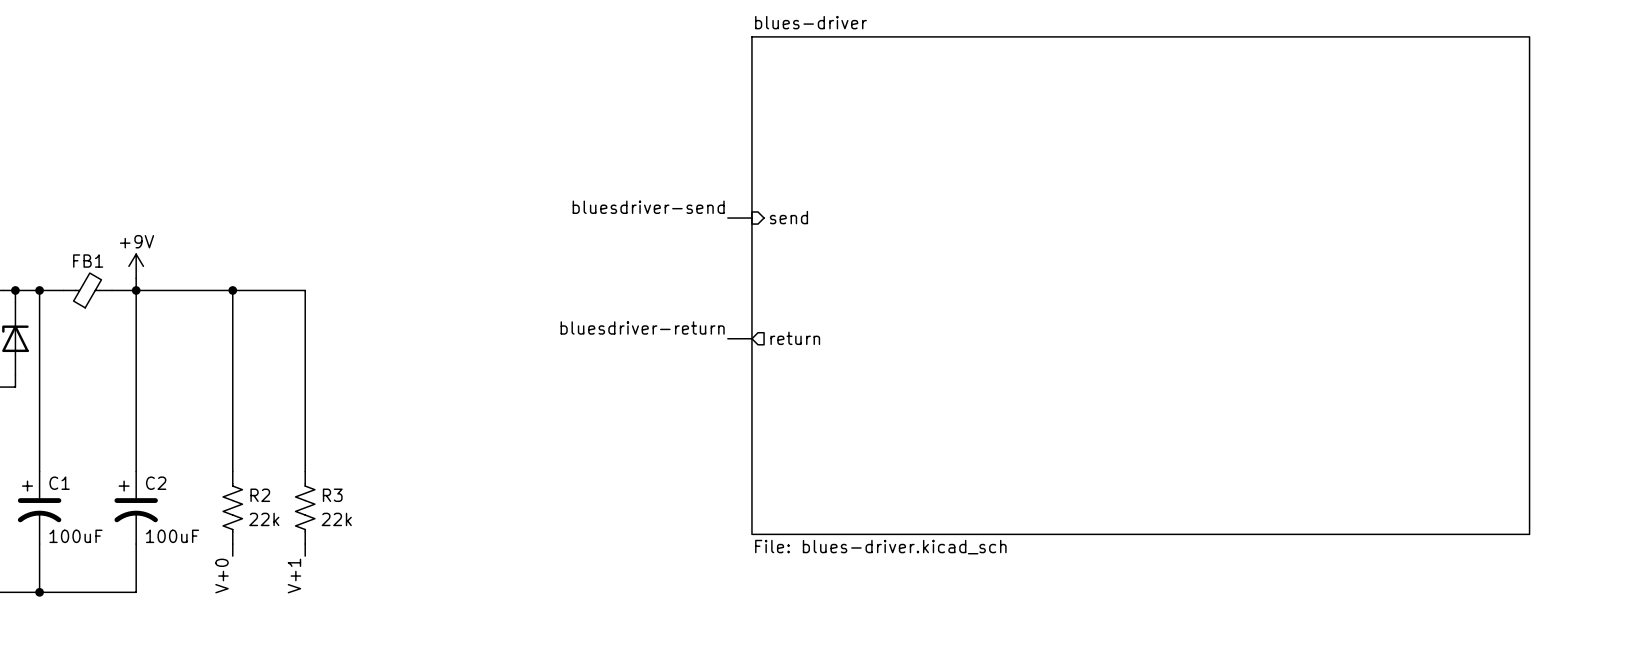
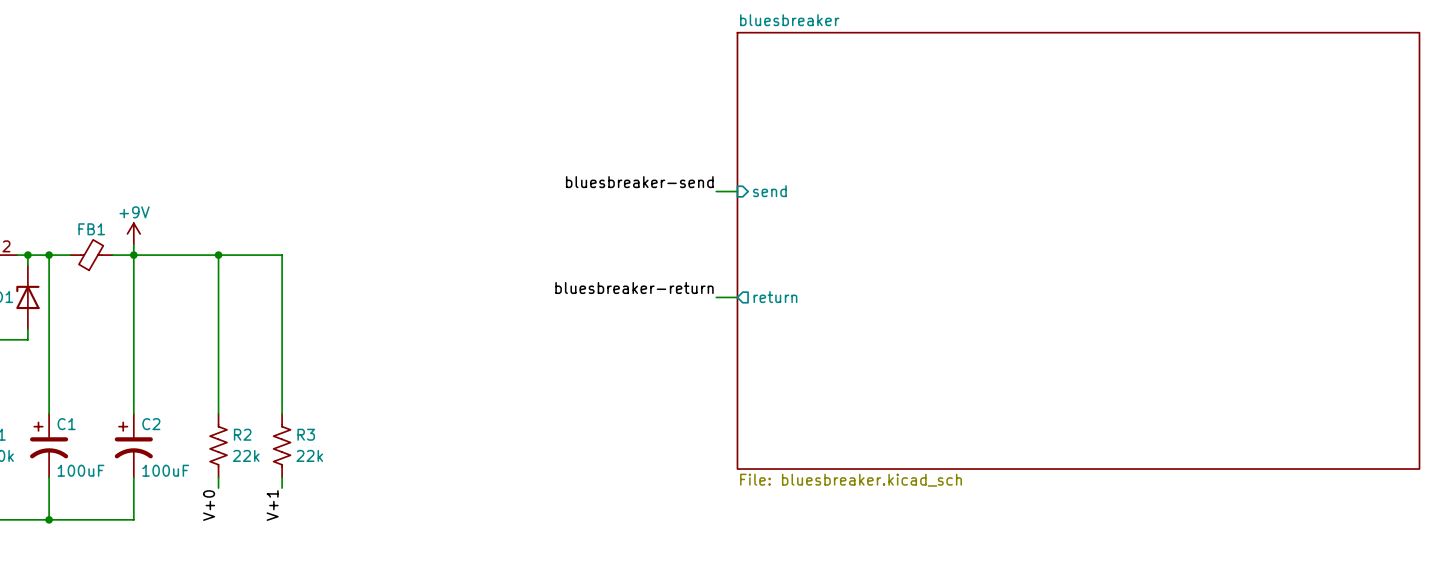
label: bluesdriver-send (648, 207) -> bluesbreaker-send (639, 182)
sheet pin position: send (788, 217) -> send (769, 191)
wire: (727, 218) (751, 218) -> (716, 191) (737, 191)
sheet blues-driver: File: blues-driver.kicad_sch (1140, 285) -> none
sheet bluesbreaker: none -> File: bluesbreaker.kicad_sch (1078, 250)
label: bluesdriver-return (642, 327) -> bluesbreaker-return (634, 288)
wire: (727, 338) (751, 338) -> (716, 297) (737, 297)
sheet pin position: return (795, 338) -> return (775, 297)

